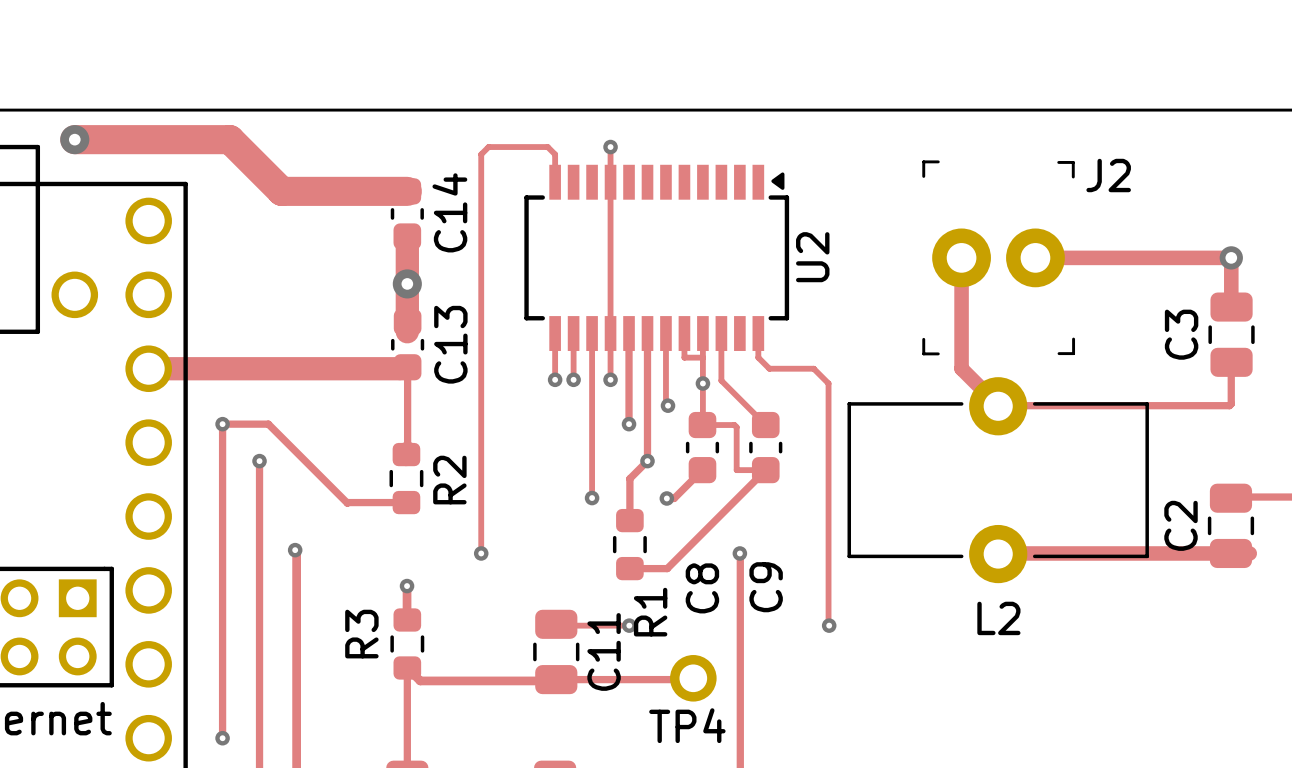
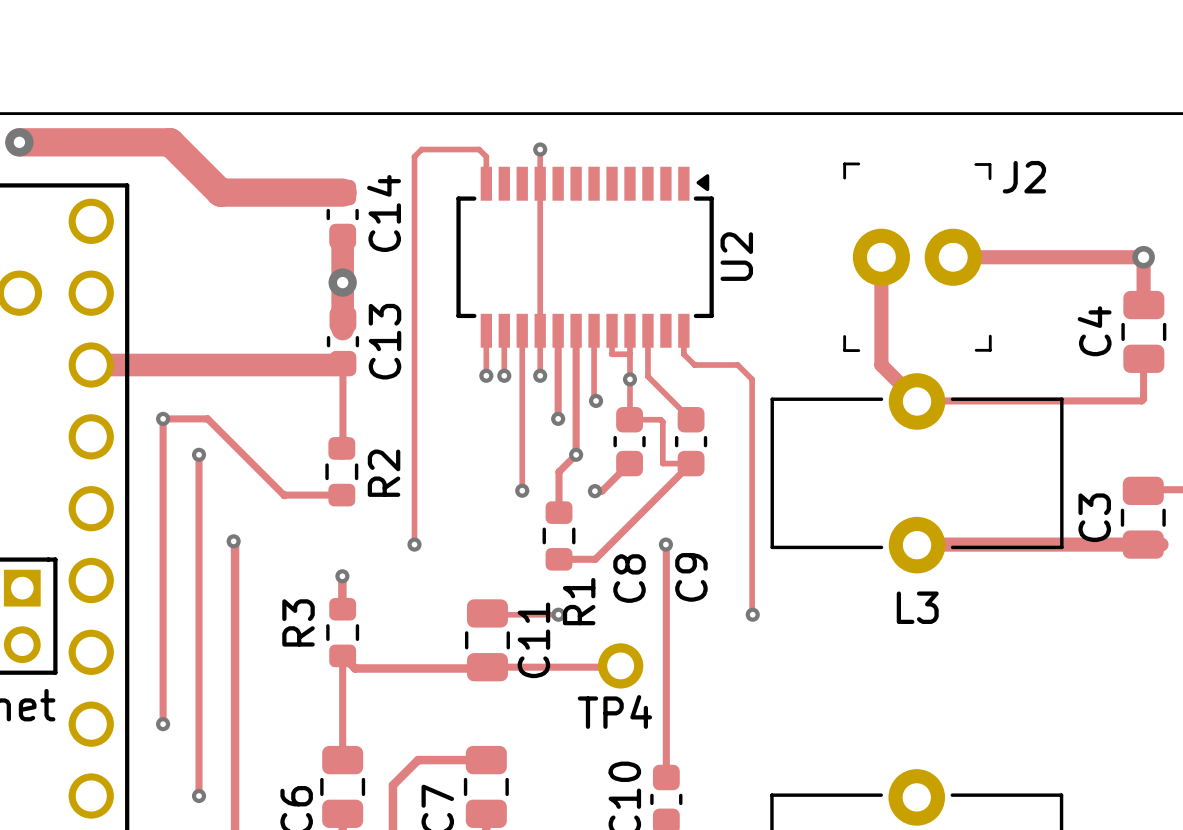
C3 name: C3 (1181, 334) -> C4 (1094, 331)
C2 name: C2 (1181, 525) -> C3 (1094, 517)
L2 name: L2 (998, 618) -> L3 (917, 607)

